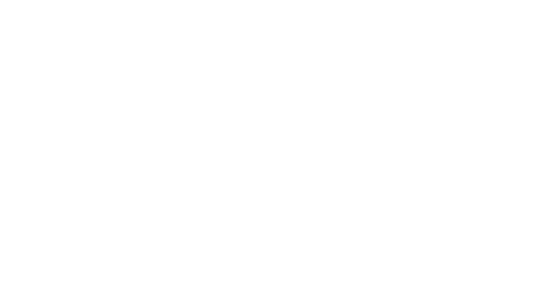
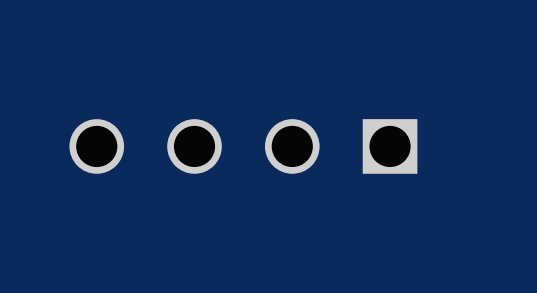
part: none -> (243, 146)

